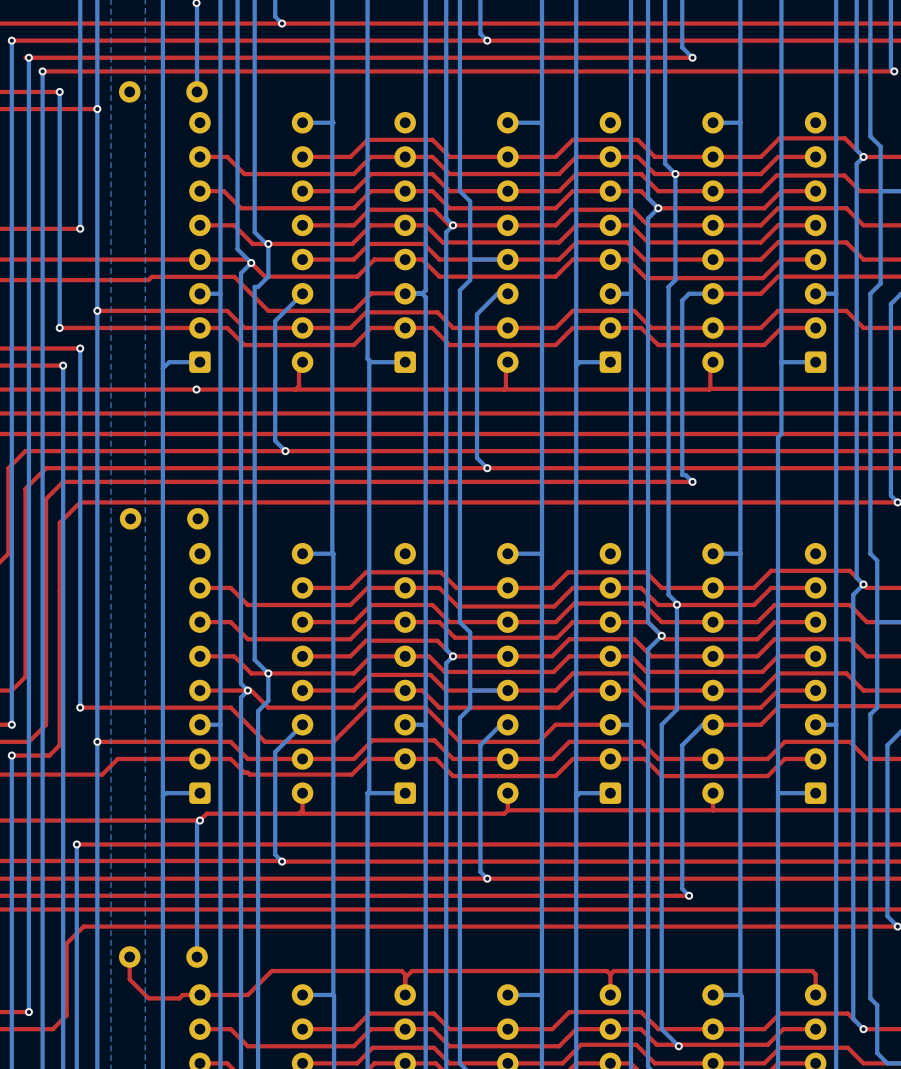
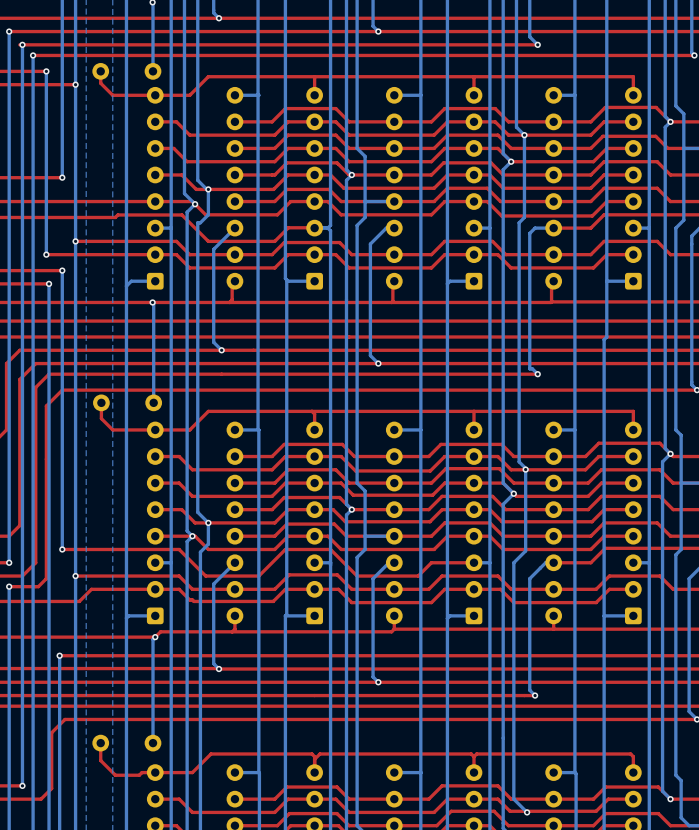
top track: none -> (100, 71) (100, 83) (112, 95) (189, 95) (208, 76) (633, 76) (633, 95)
top track: none -> (314, 76) (314, 95)
top track: none -> (473, 76) (473, 95)
bottom track: none -> (152, 302) (153, 402)
top track: none -> (101, 402) (101, 418) (112, 429) (189, 429) (208, 411) (633, 411) (633, 429)
top track: none -> (311, 411) (314, 414) (314, 429)
top track: none -> (473, 411) (473, 429)

